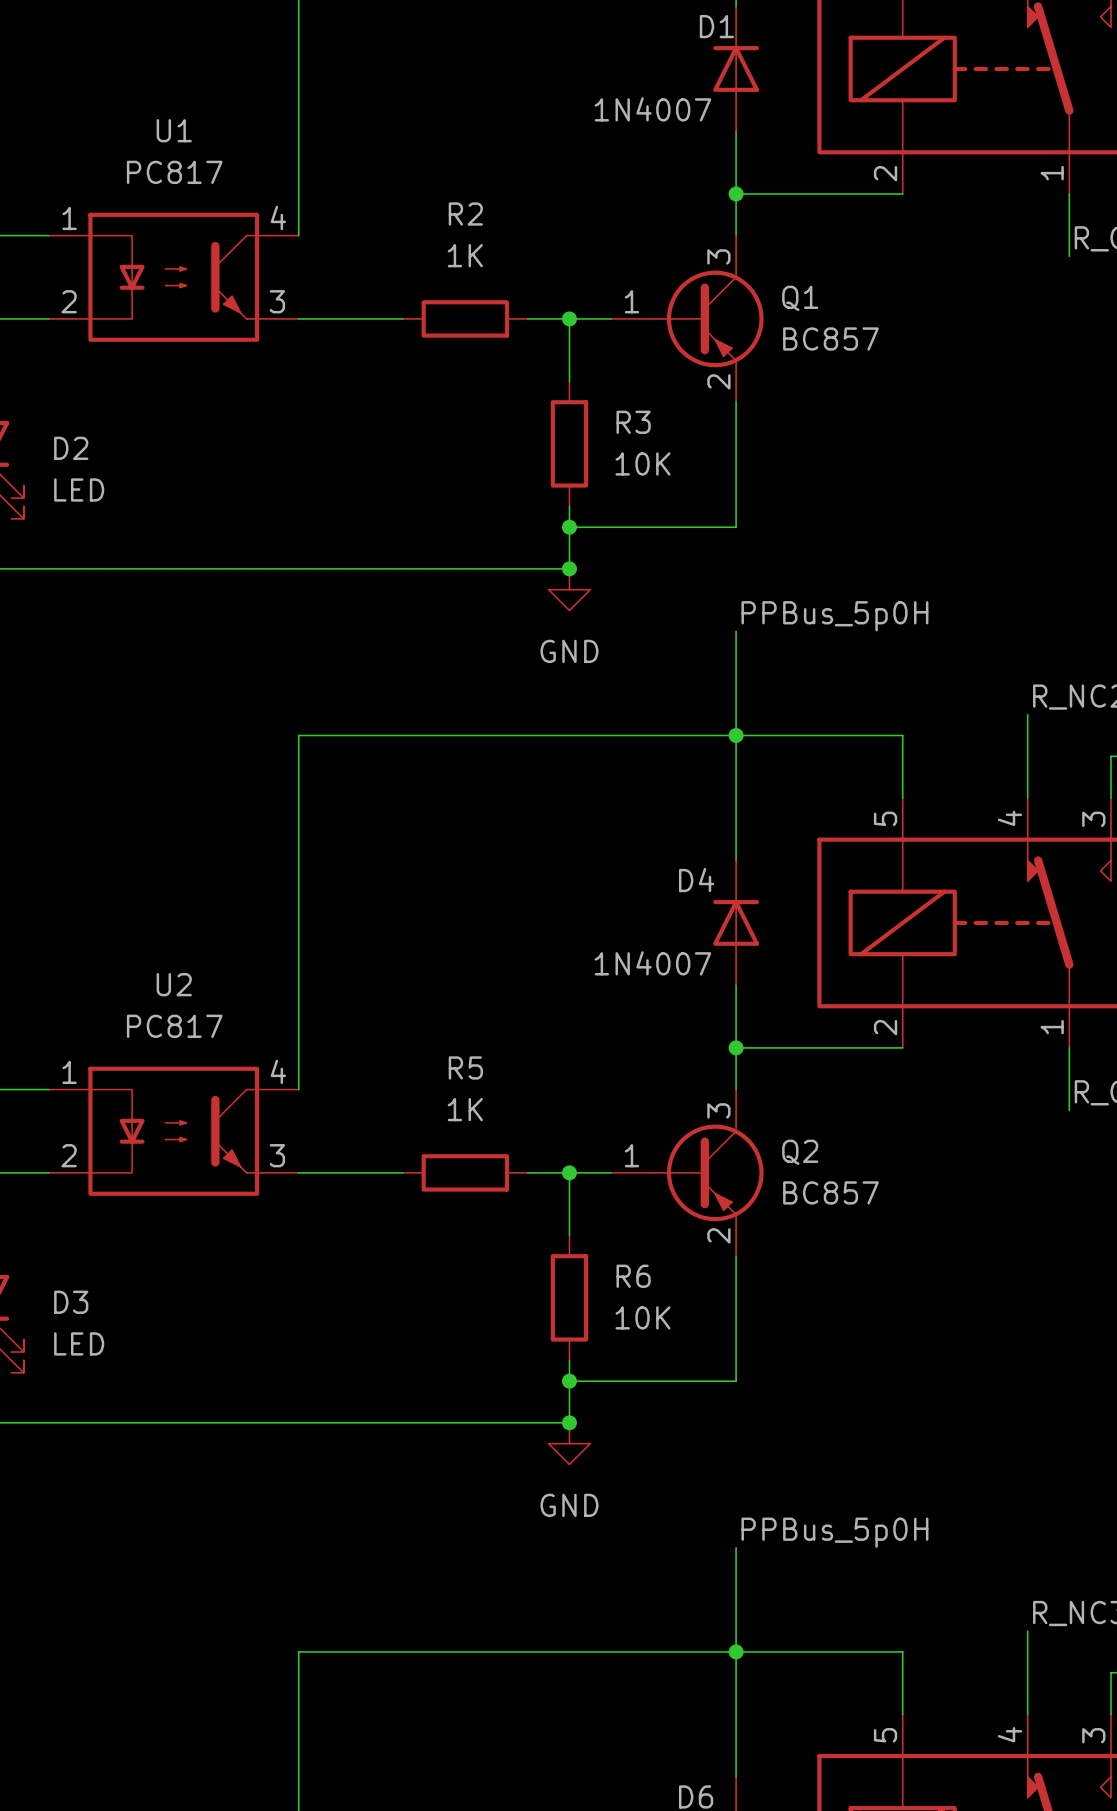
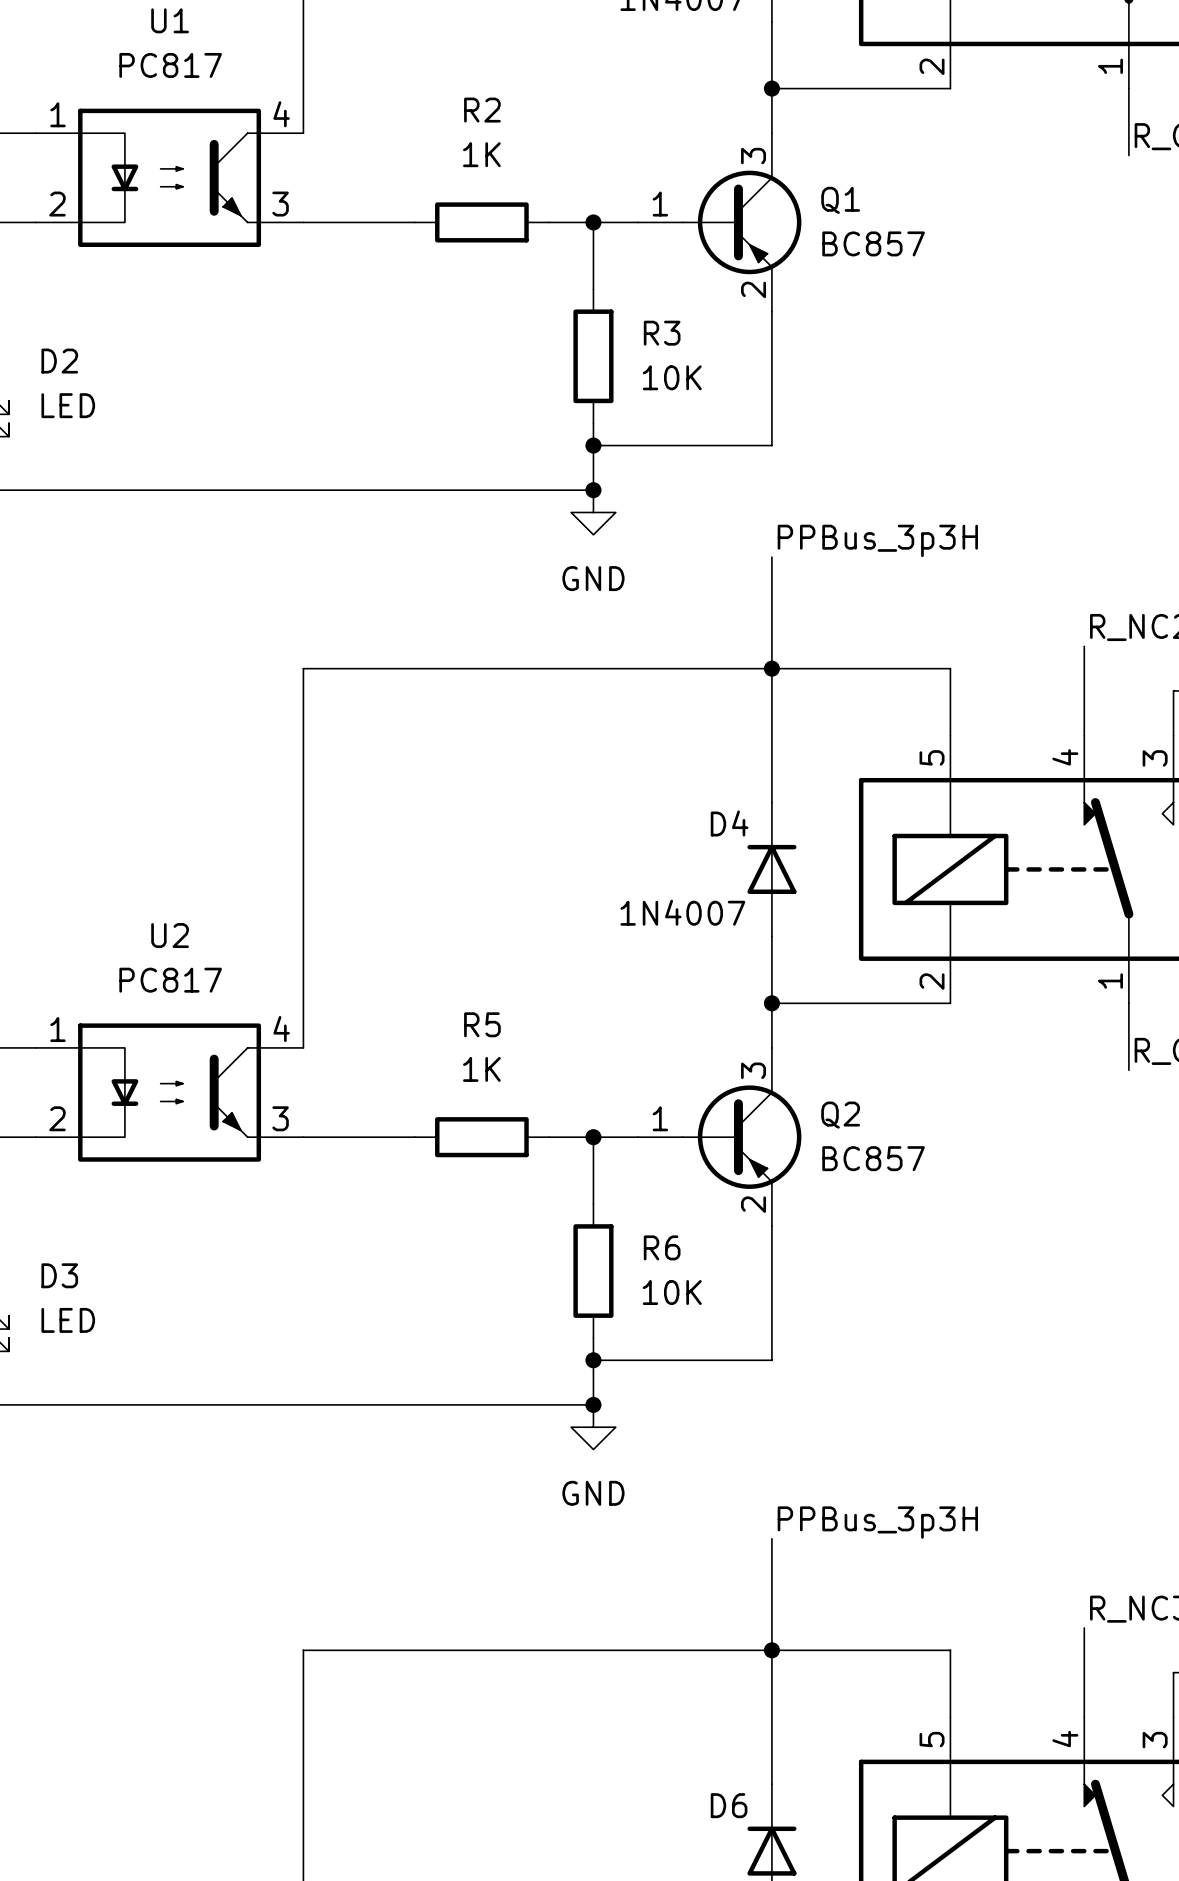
label: PPBus_5p0H (834, 616) -> PPBus_3p3H (877, 540)
label: PPBus_5p0H (834, 1532) -> PPBus_3p3H (877, 1522)

